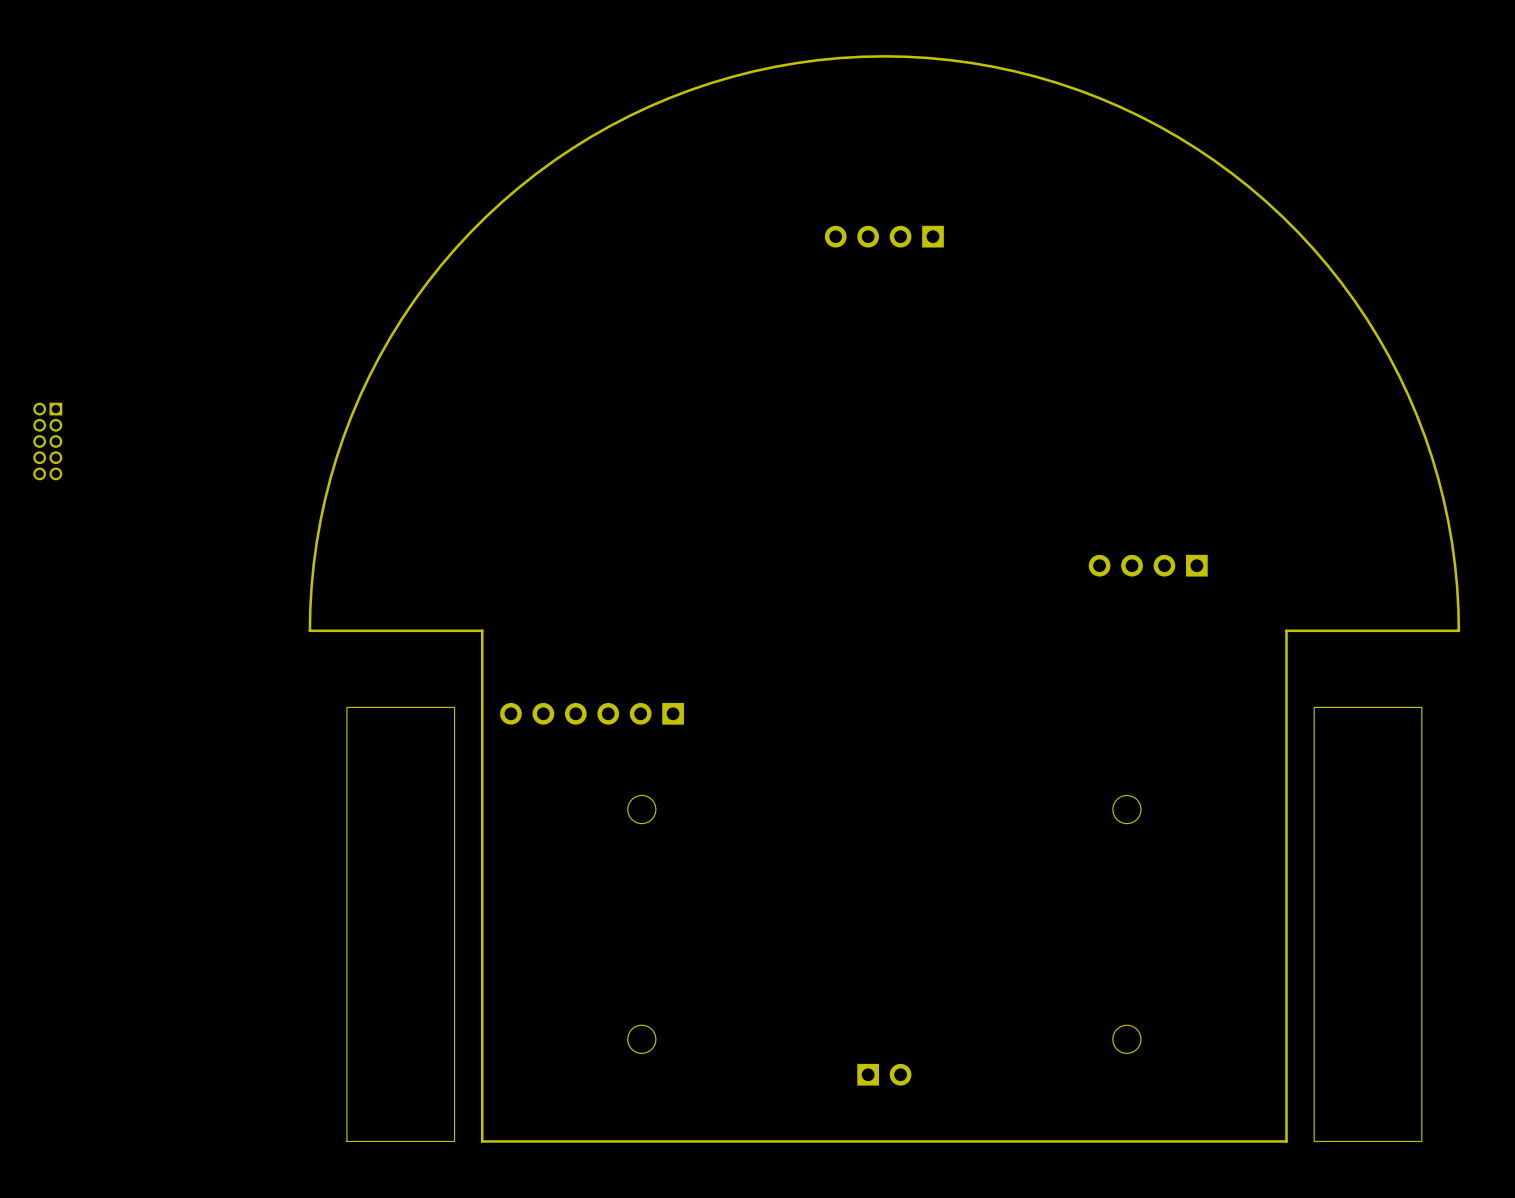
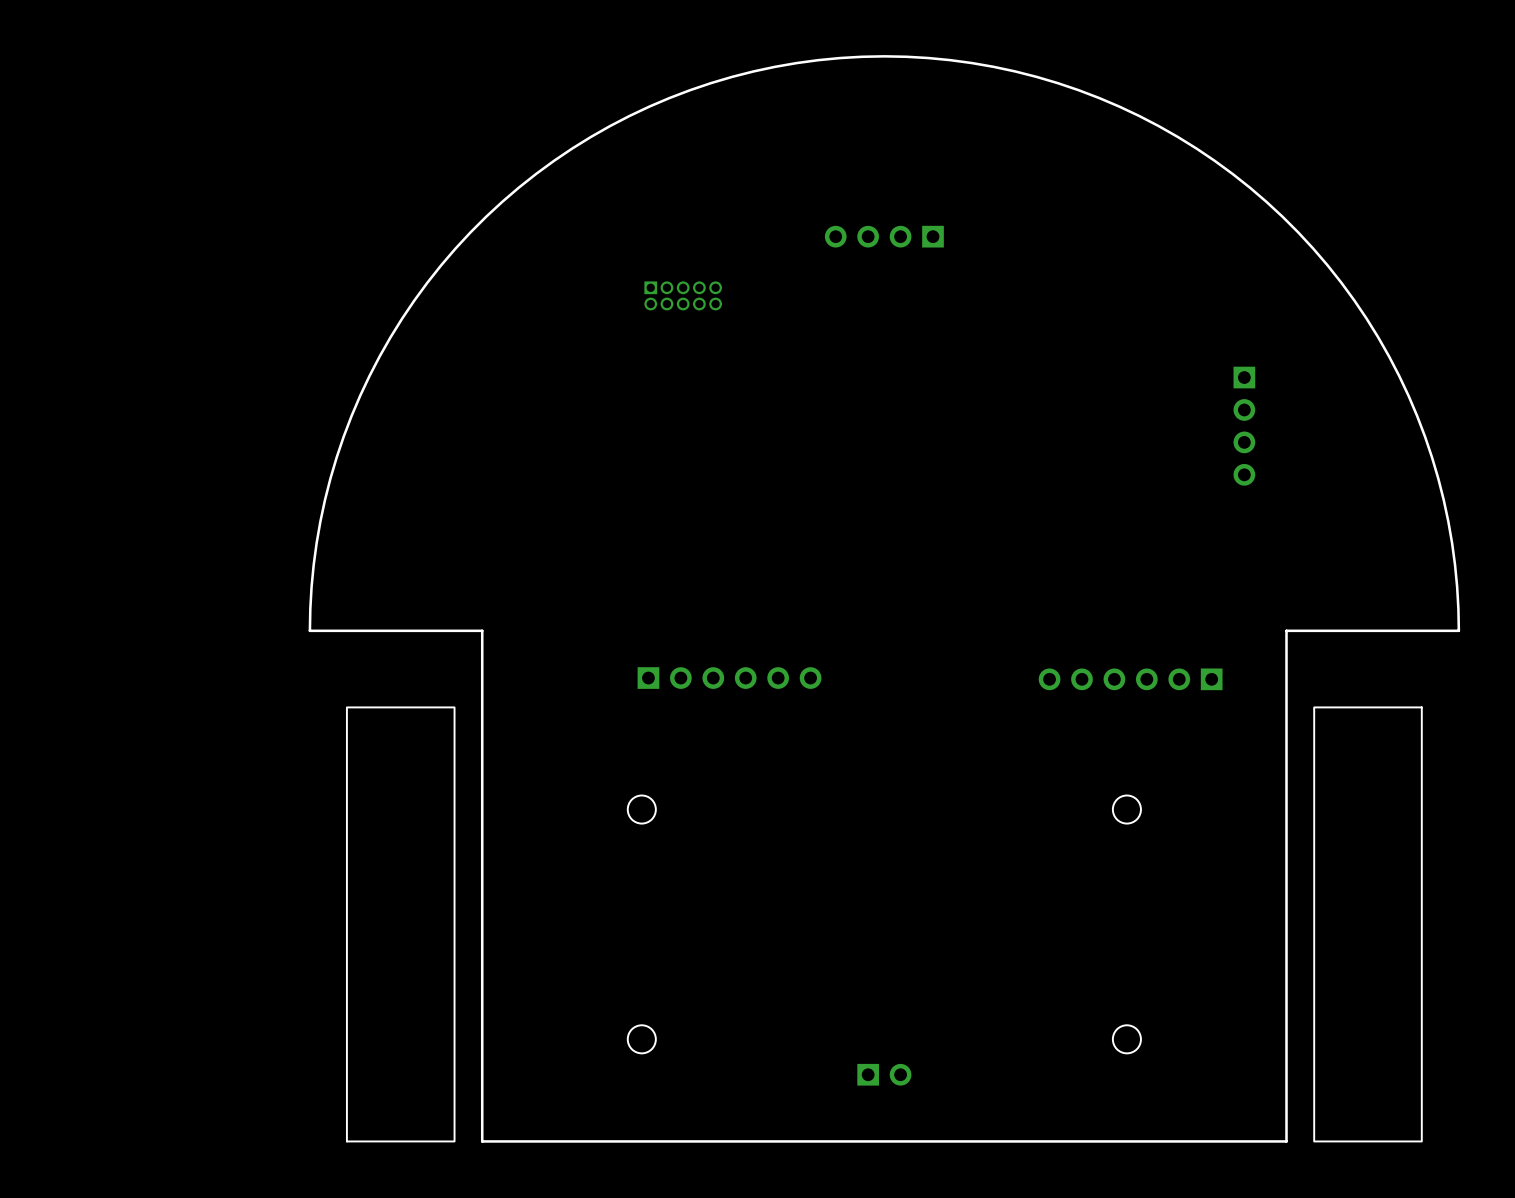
part: none -> (683, 295)
part: (47, 441) -> none
part rotation: 0° (1148, 565) -> 90° counterclockwise (1244, 426)
part position: (1148, 565) -> (1244, 426)
part: none -> (1130, 679)
part rotation: 0° (592, 713) -> 180° (729, 678)
part position: (592, 713) -> (729, 678)

